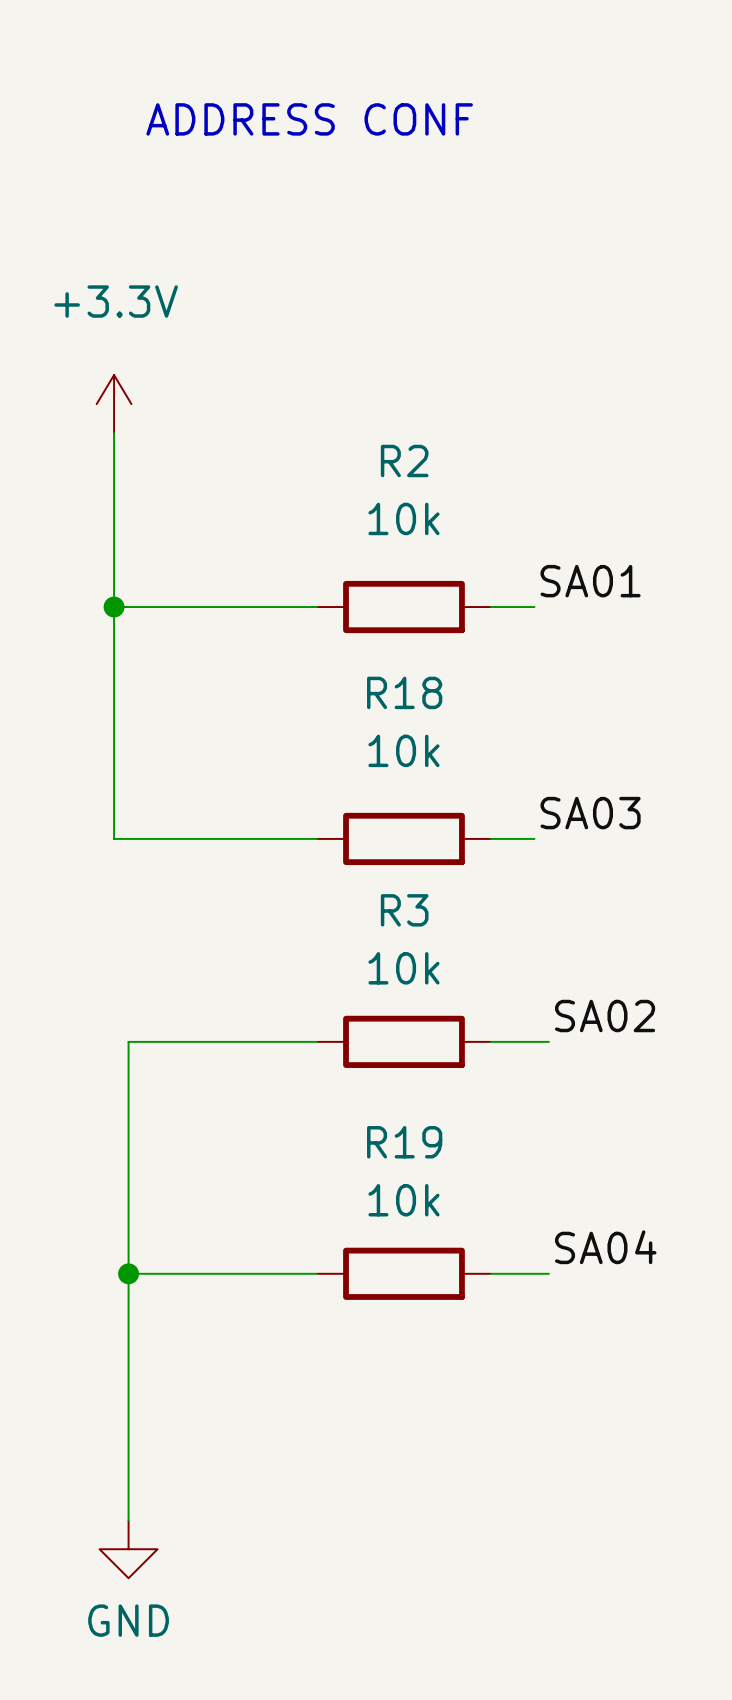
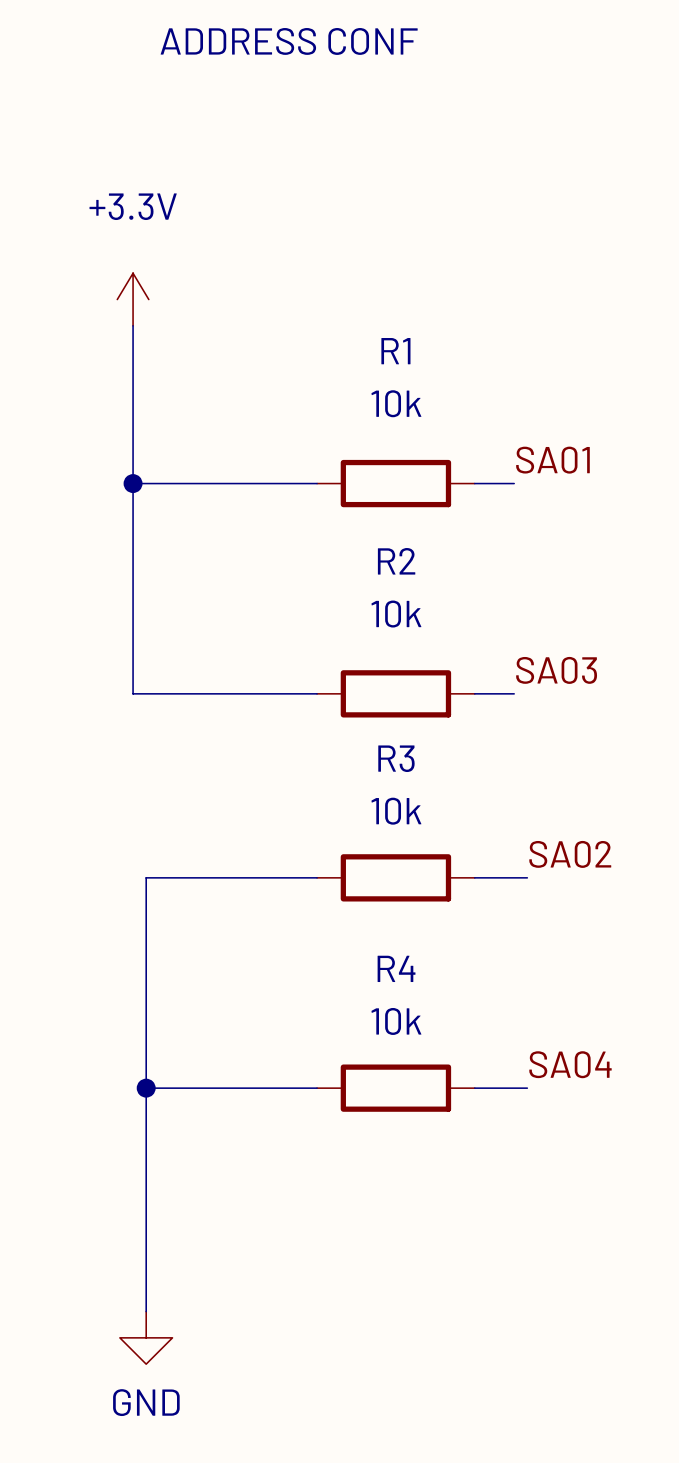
R2 name: R2 (404, 460) -> R1 (395, 351)
R18 name: R18 (404, 692) -> R2 (396, 561)
R19 name: R19 (404, 1142) -> R4 (396, 968)

